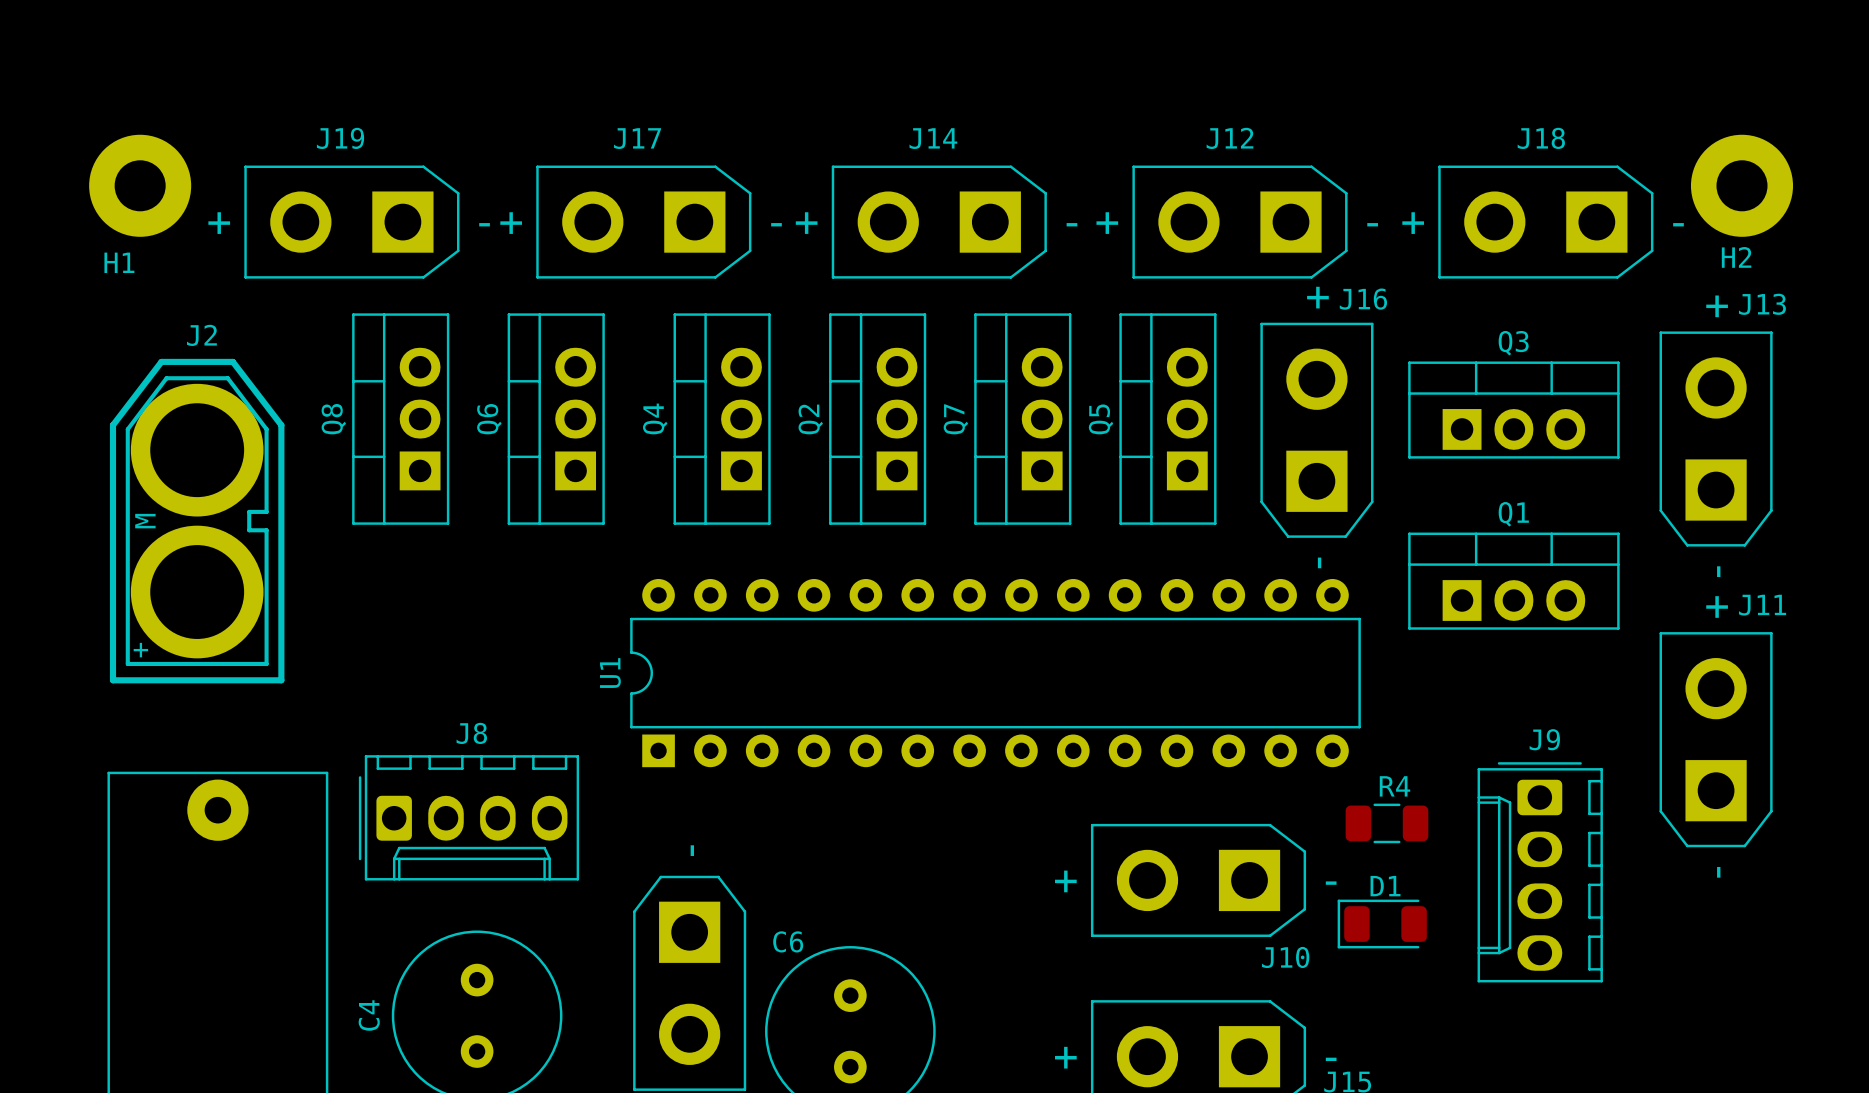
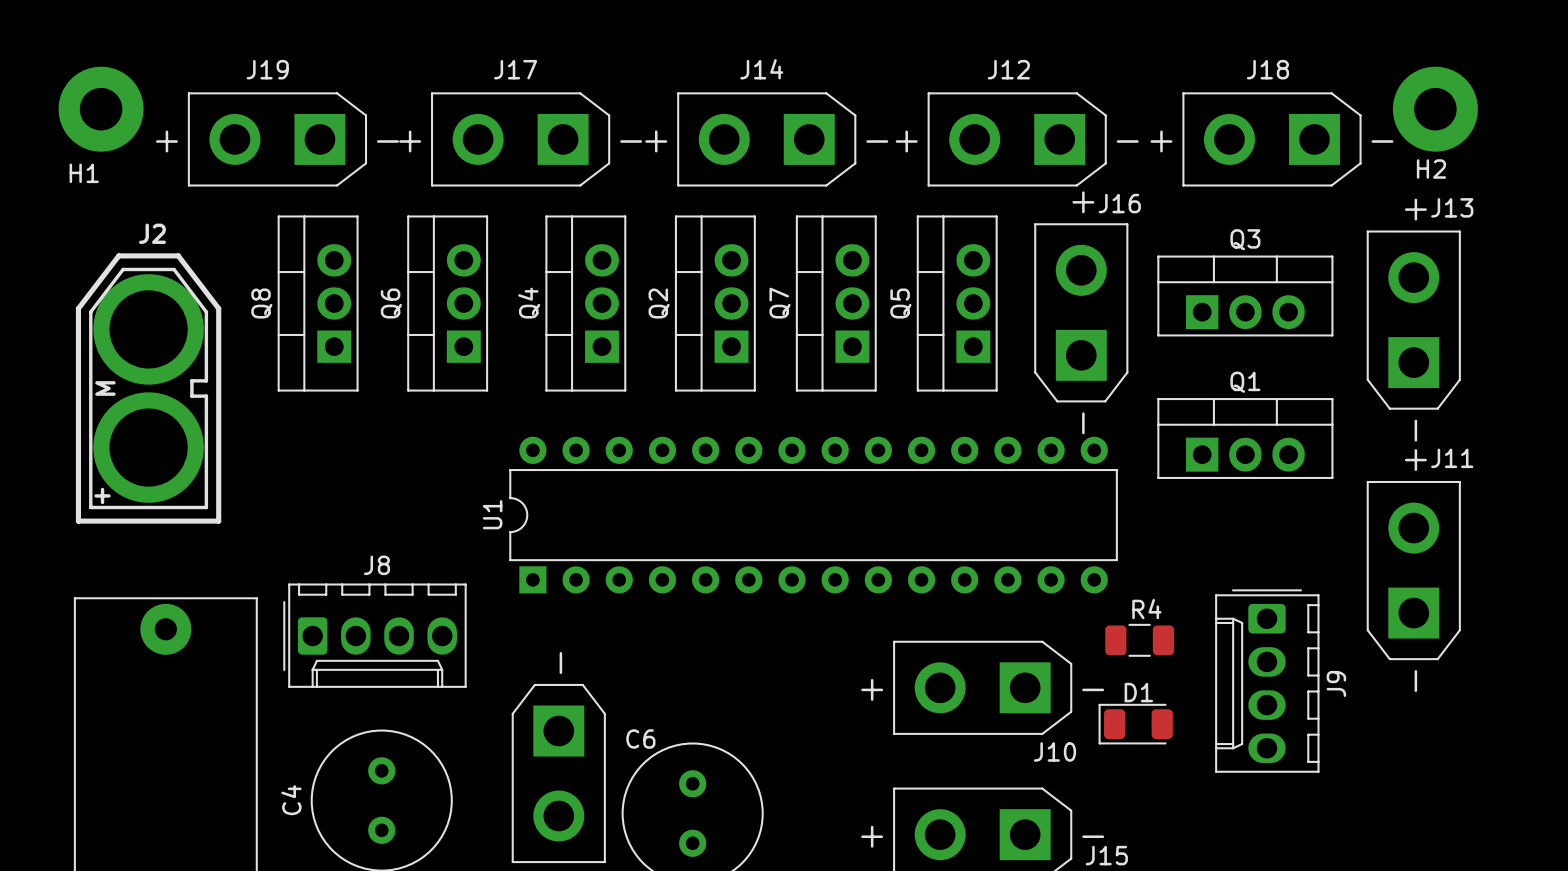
J9 name rotation: 0° (1544, 739) -> 90° counterclockwise (1336, 683)
J9 name position: J9 (1544, 739) -> J9 (1336, 683)

